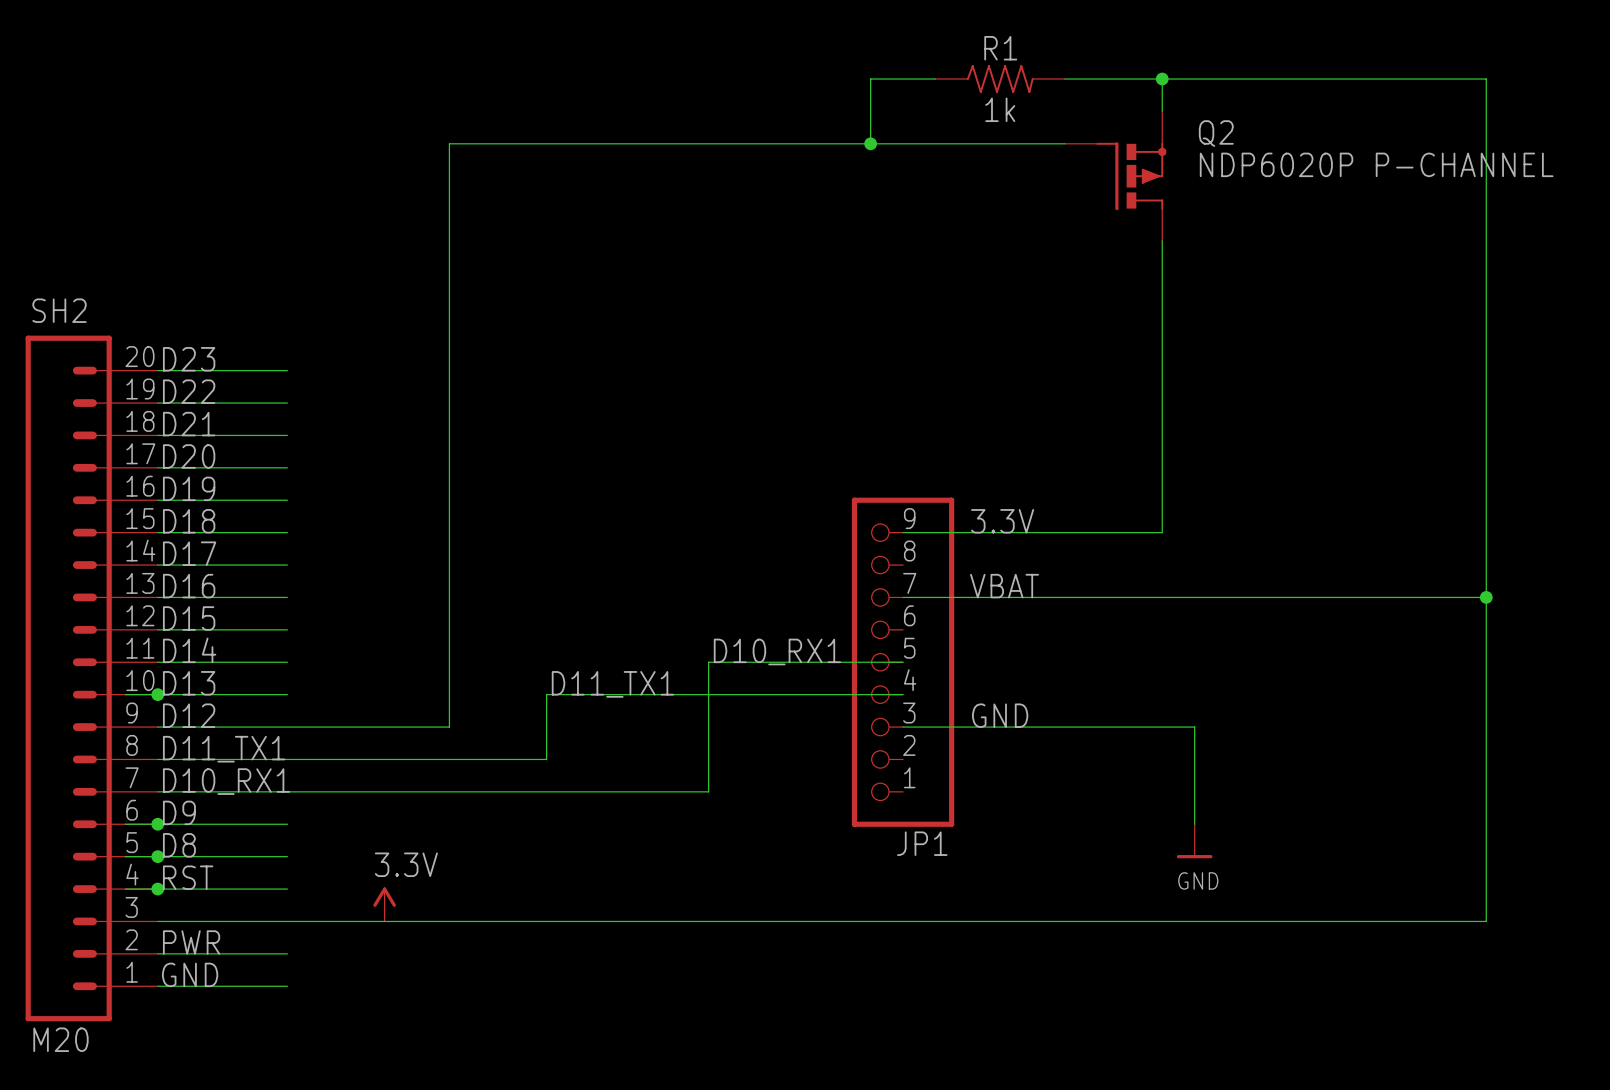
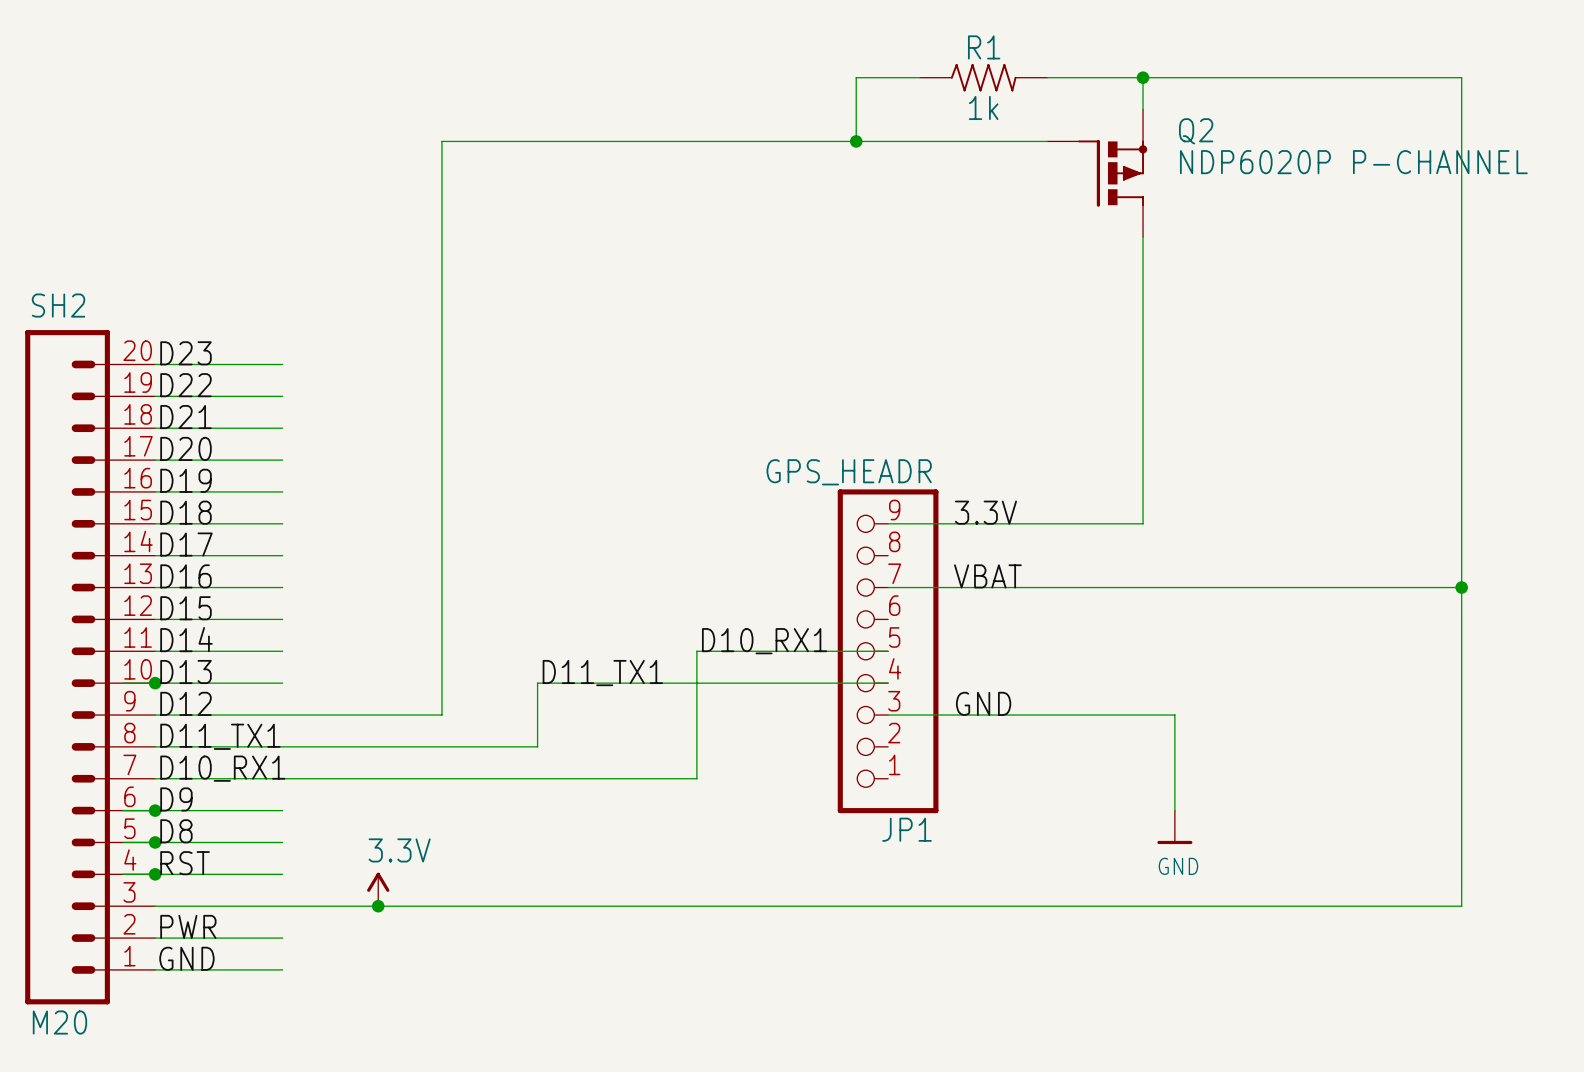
JP1 value: none -> GPS_HEADR (849, 472)
junction: none -> (378, 906)

